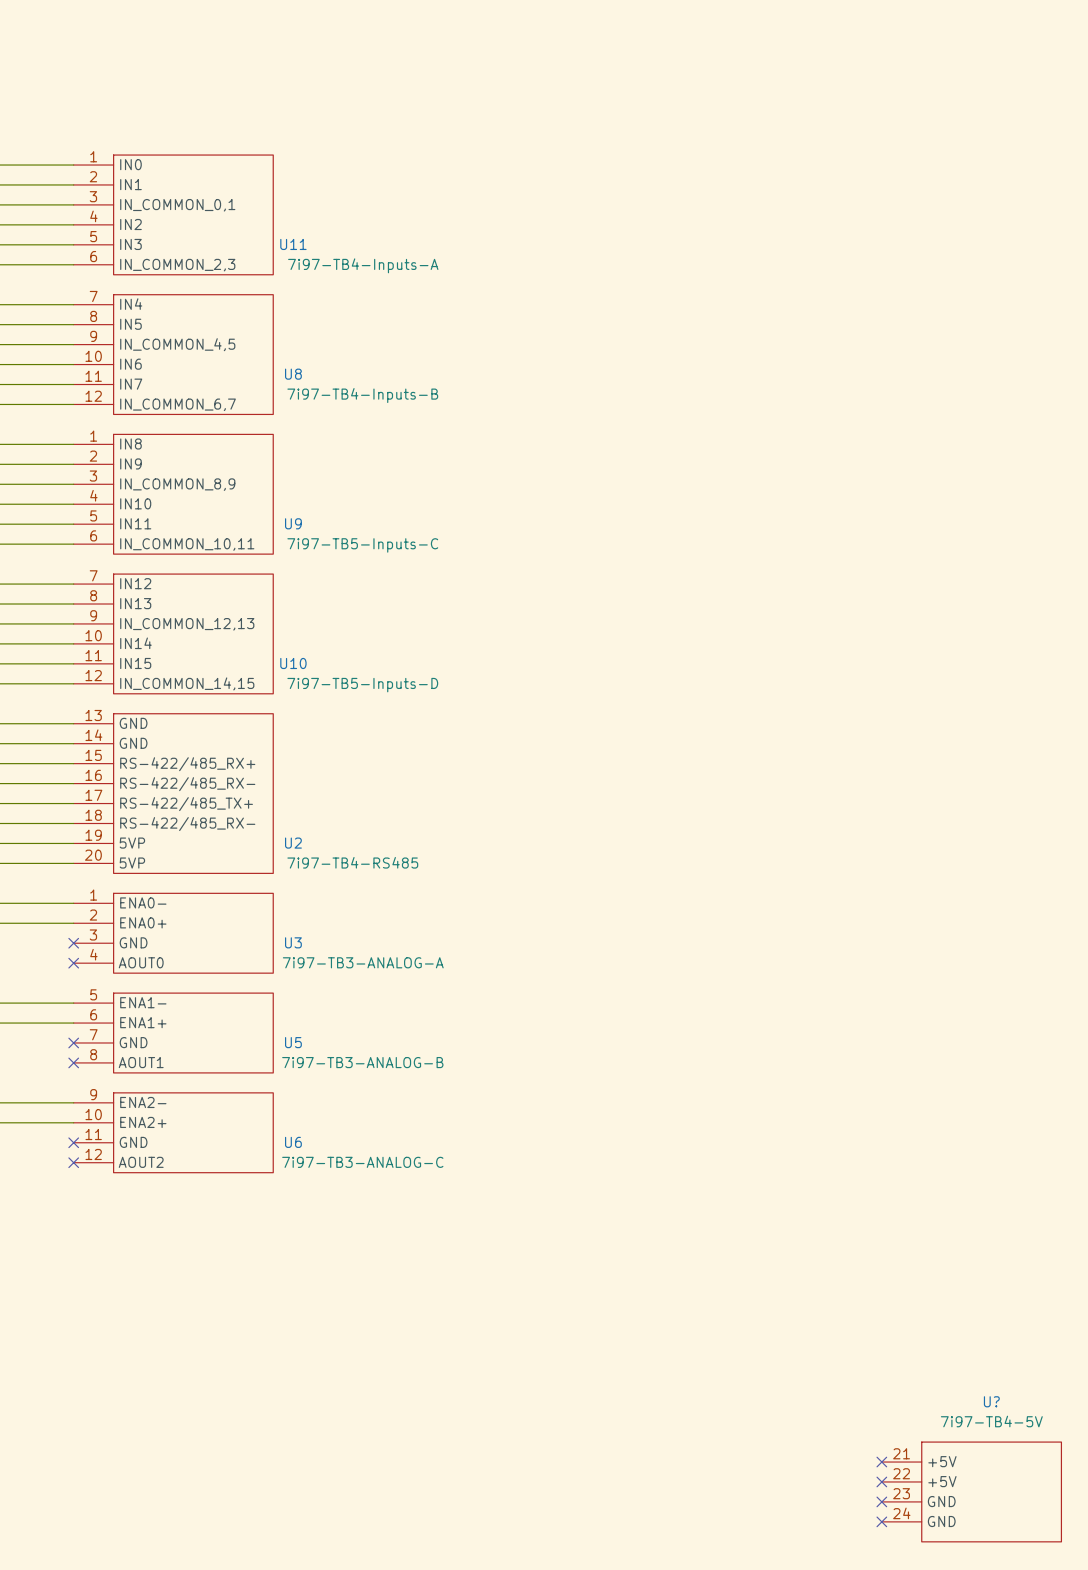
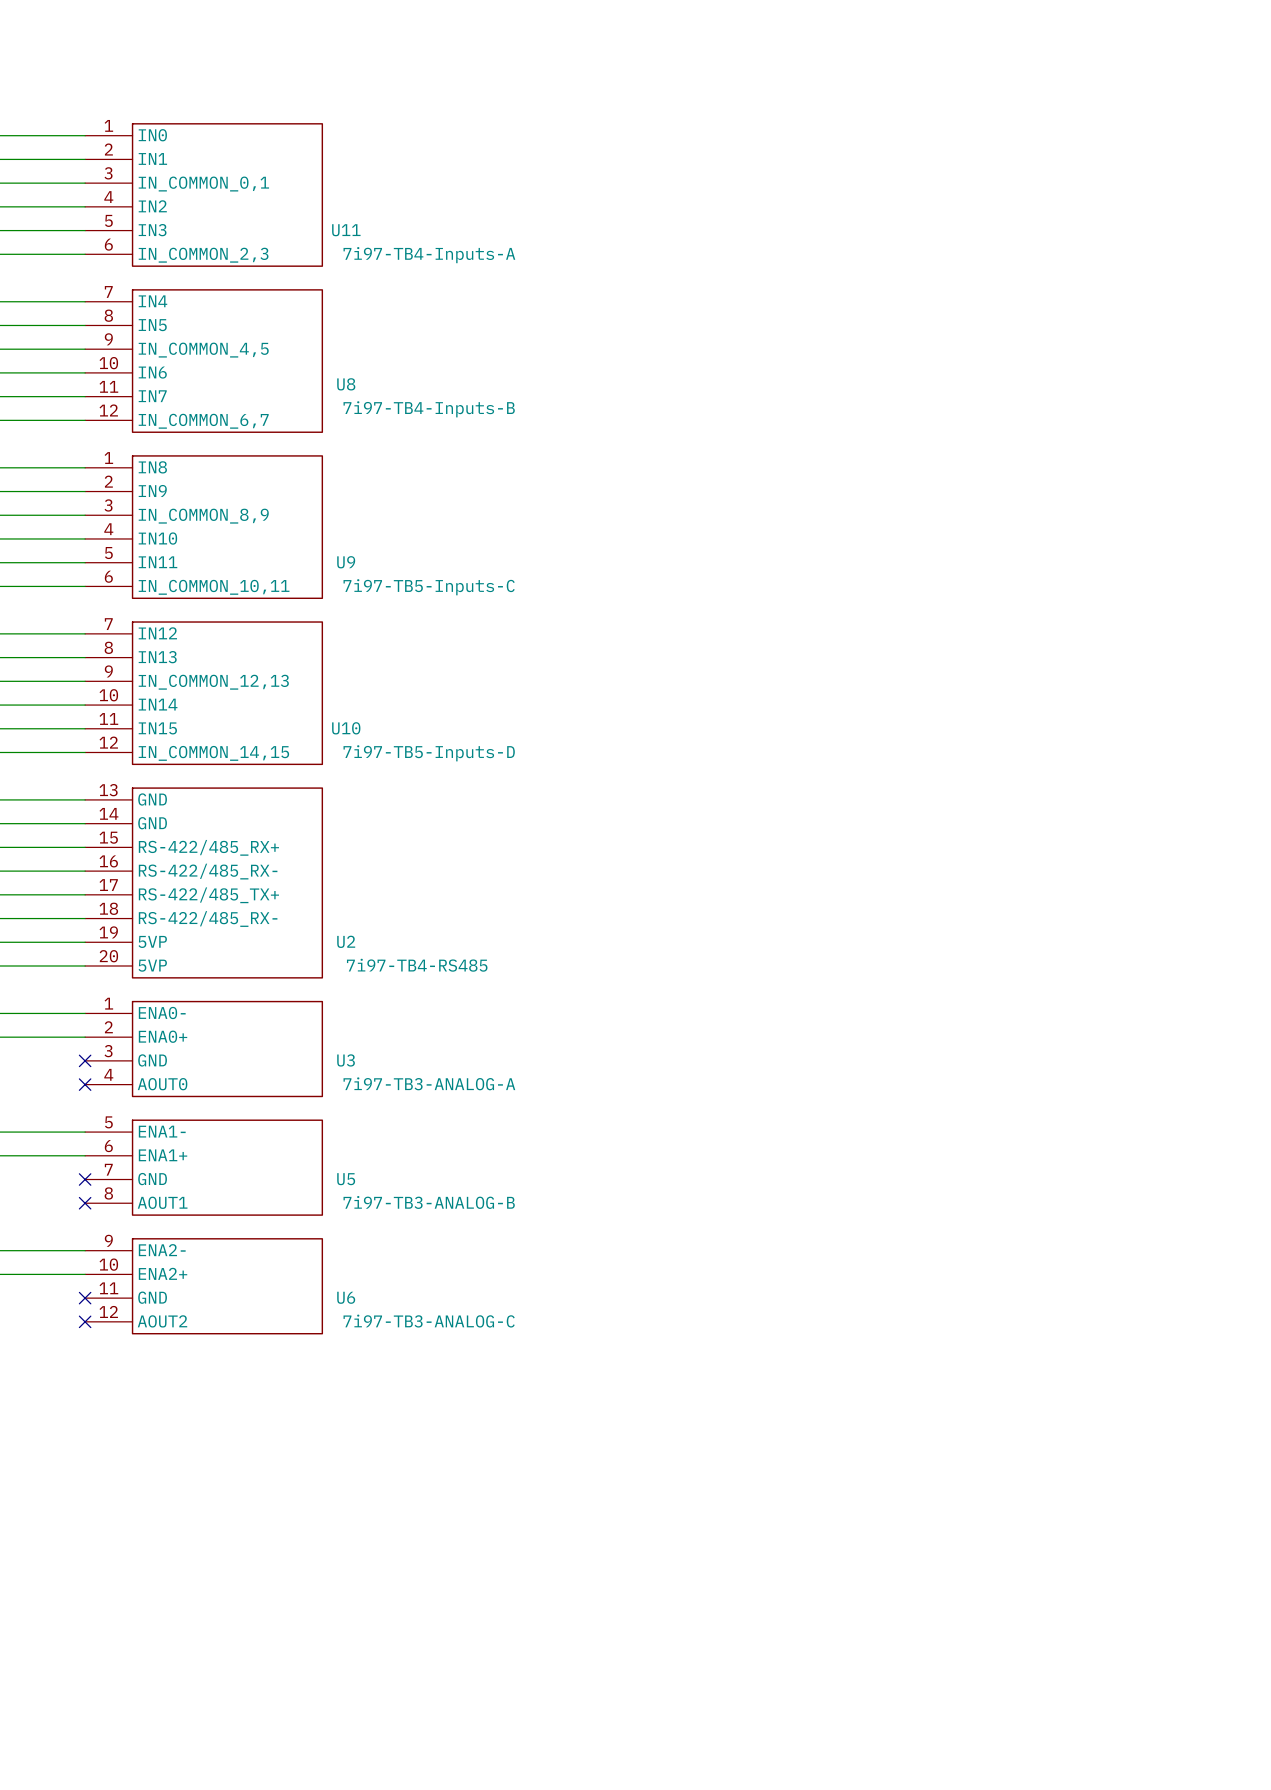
no-connect mark: (881, 1462) -> none
no-connect mark: (881, 1481) -> none
U?: 7i97-TB4-5V (971, 1491) -> none
no-connect mark: (881, 1501) -> none
no-connect mark: (881, 1521) -> none

